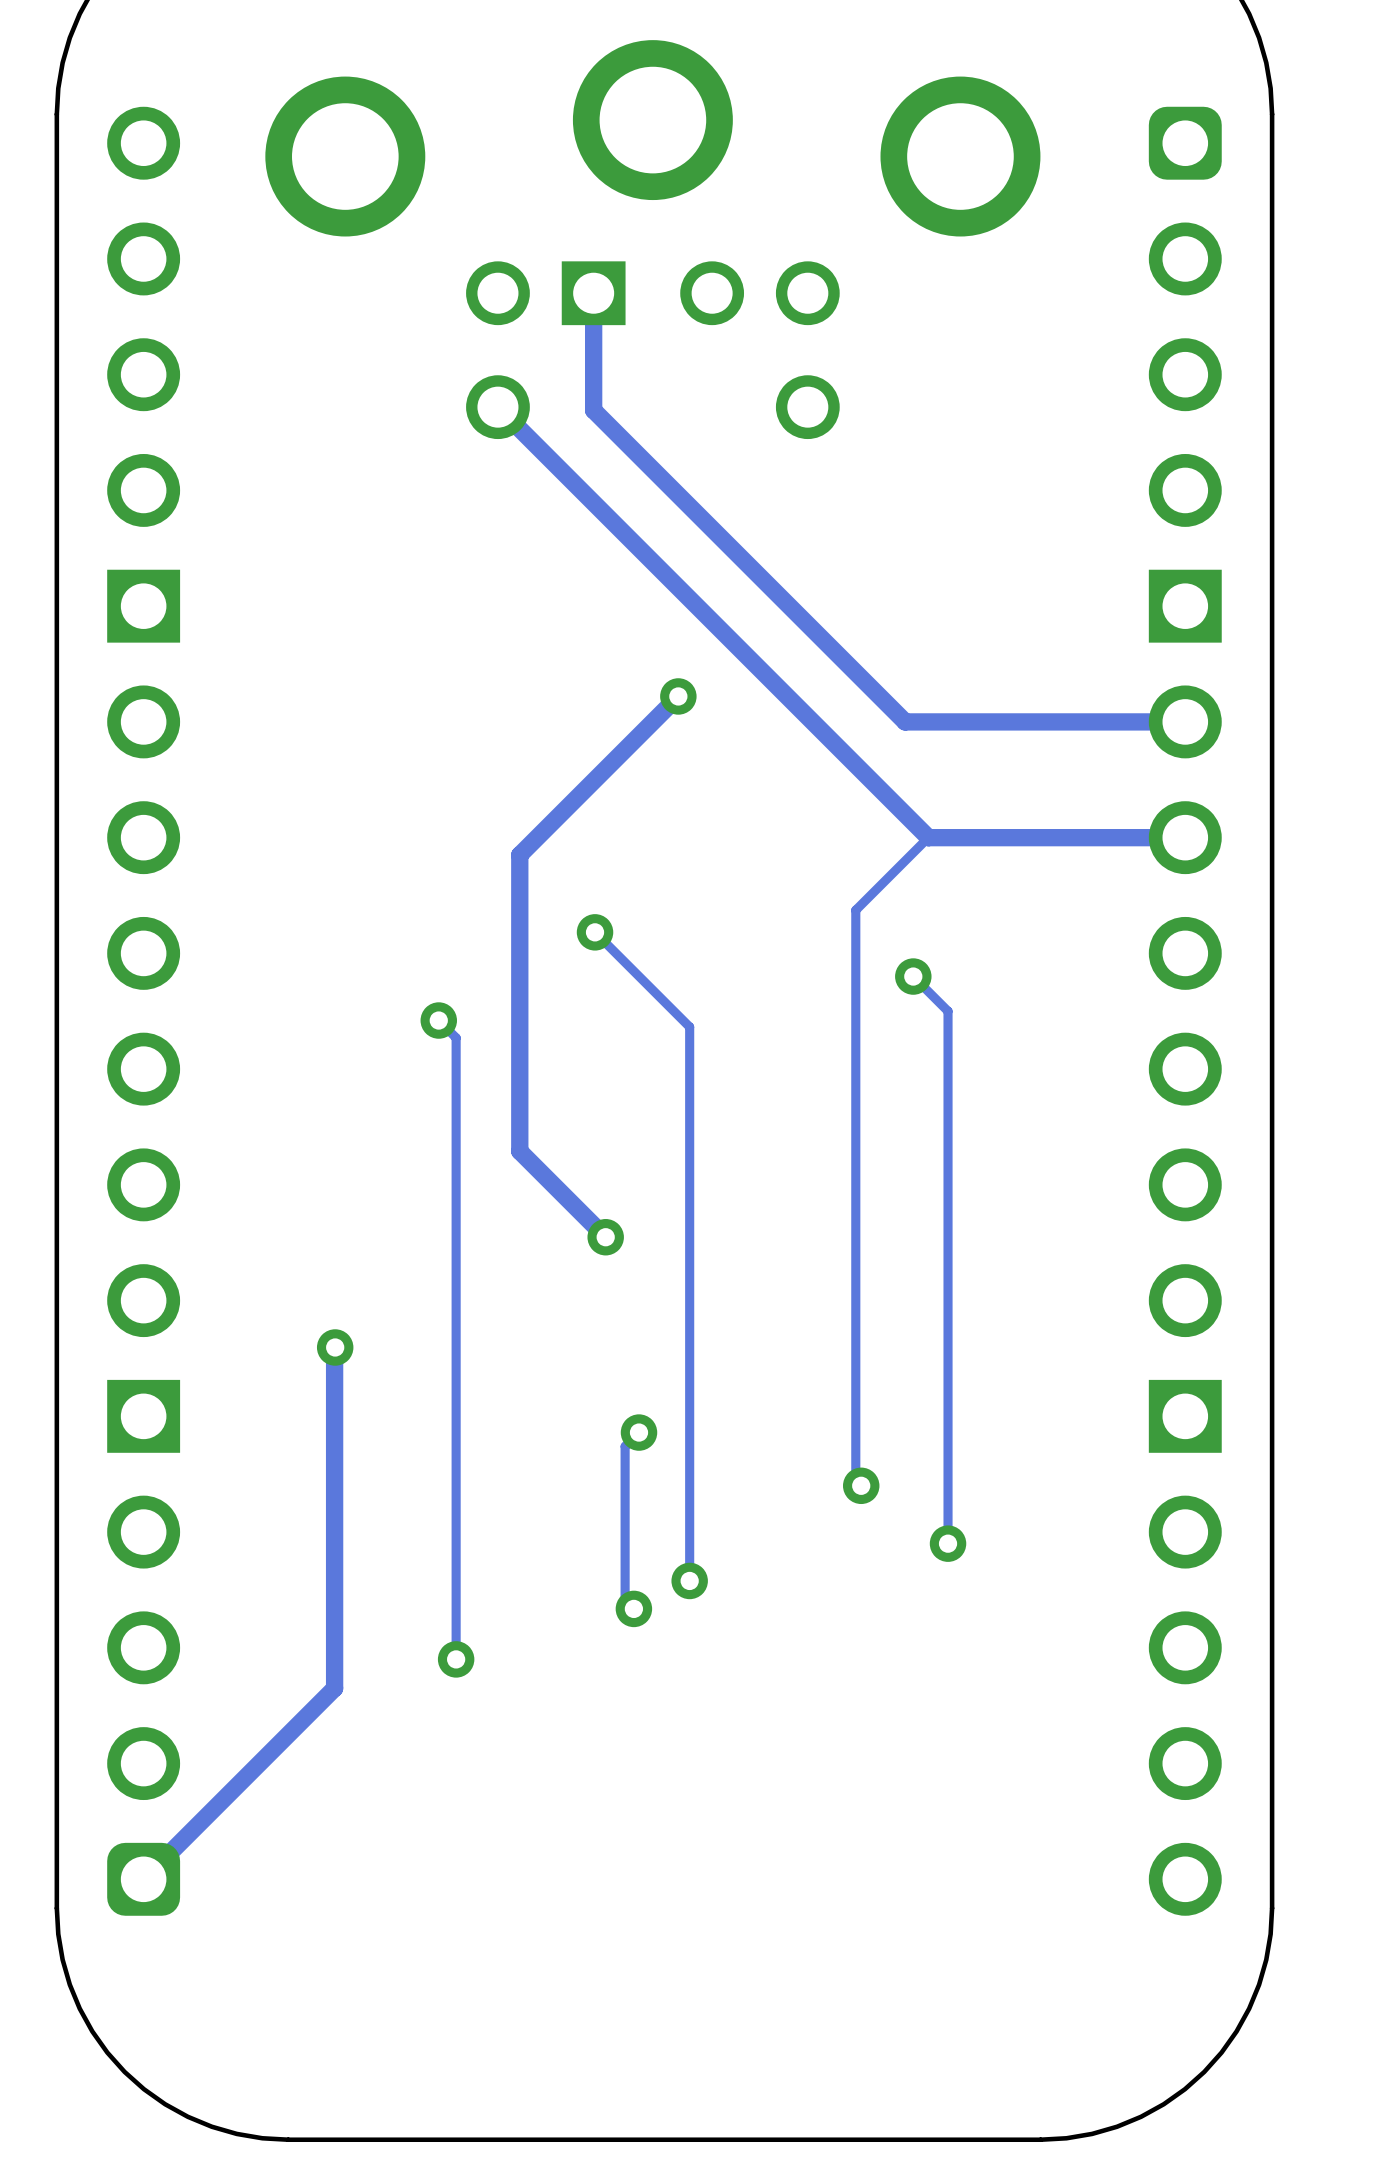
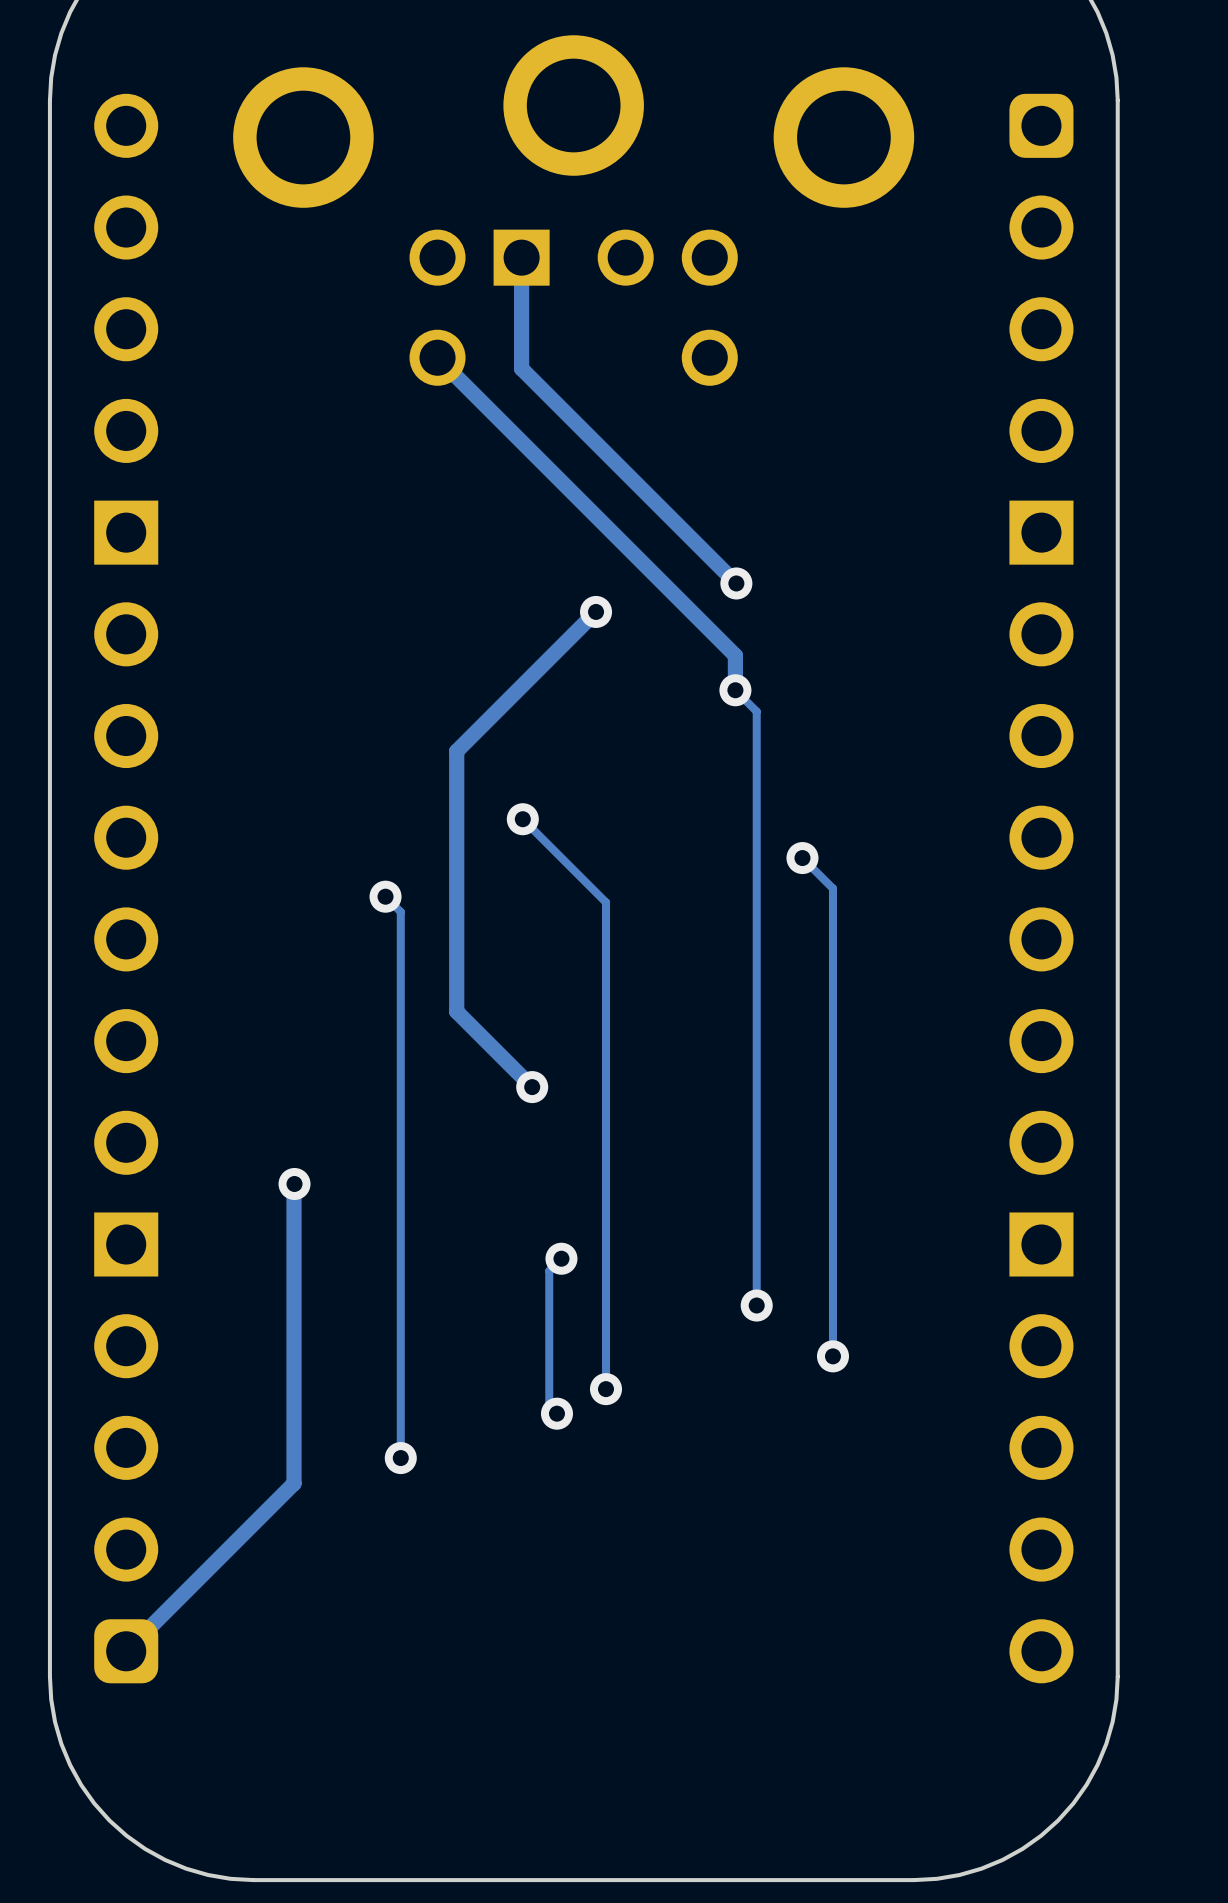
track: (593, 410) (905, 721) (1185, 721) -> (521, 360) (521, 368) (736, 583)
via: none -> (736, 583)
track: (836, 746) (928, 837) -> none
via: none -> (735, 690)
track: (928, 837) (855, 910) (855, 1480) (861, 1485) -> (735, 655) (735, 690) (756, 711) (756, 1305)
track: (1185, 837) (928, 837) -> none

